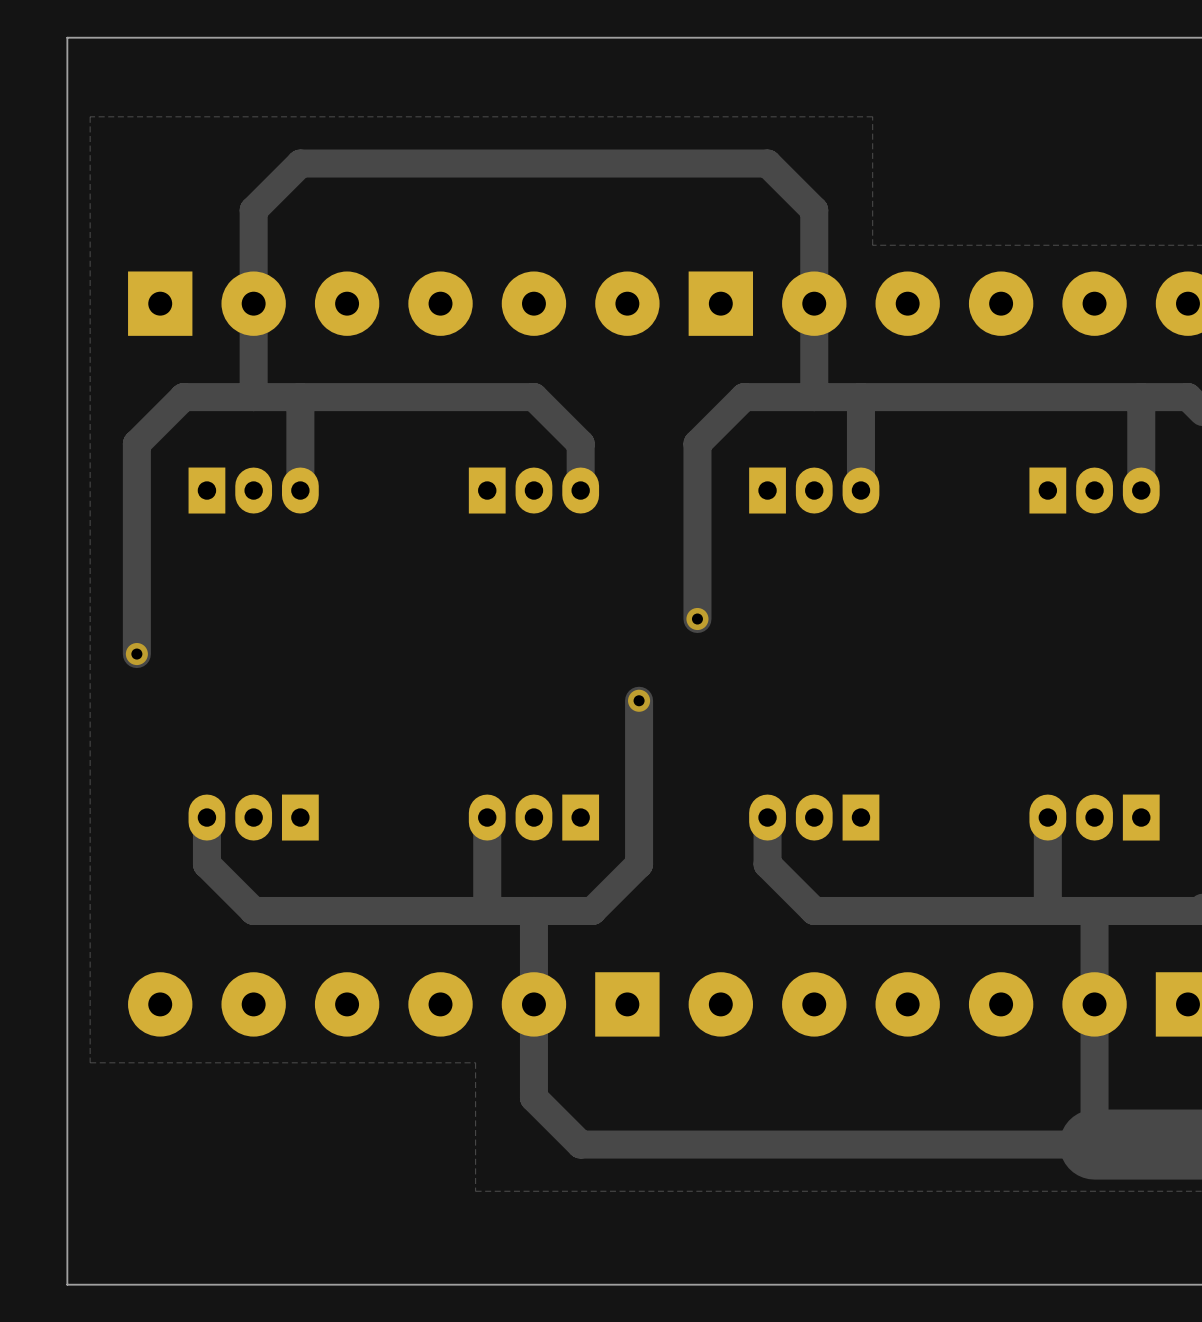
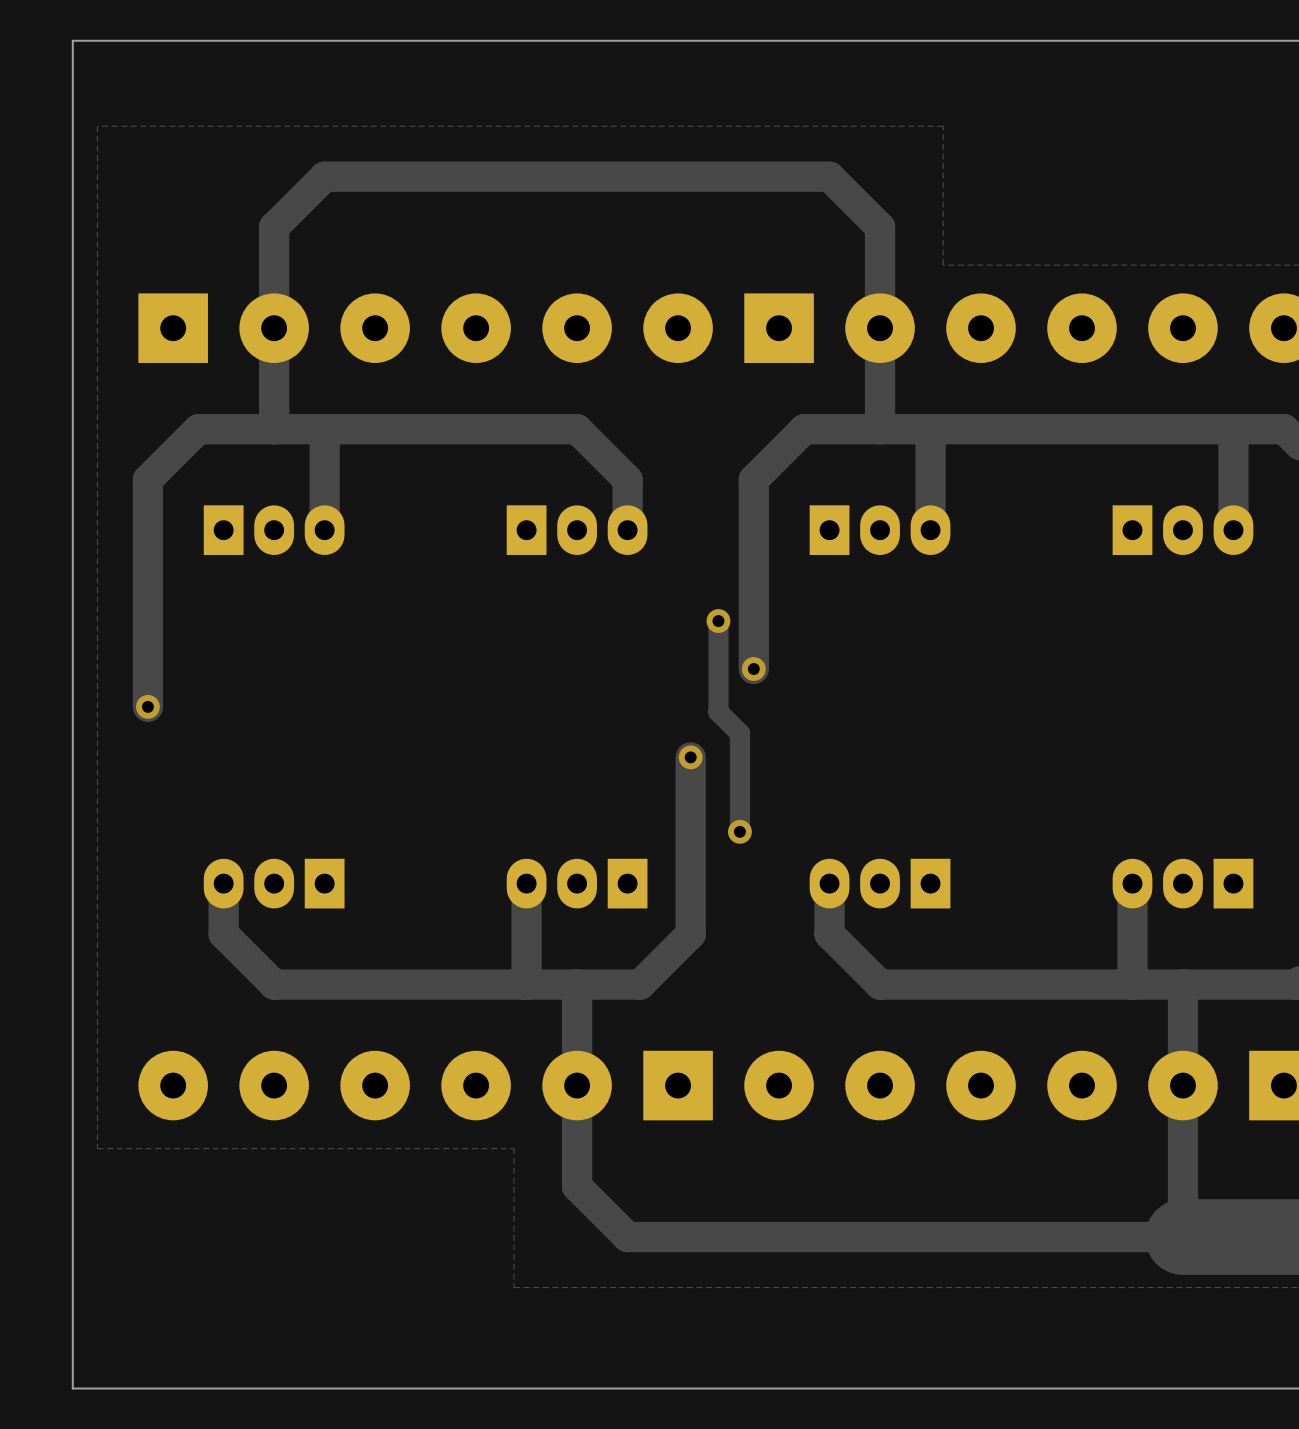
track: none -> (718, 621) (718, 711) (739, 733) (739, 831)
via: none -> (718, 621)
via: none -> (739, 831)

